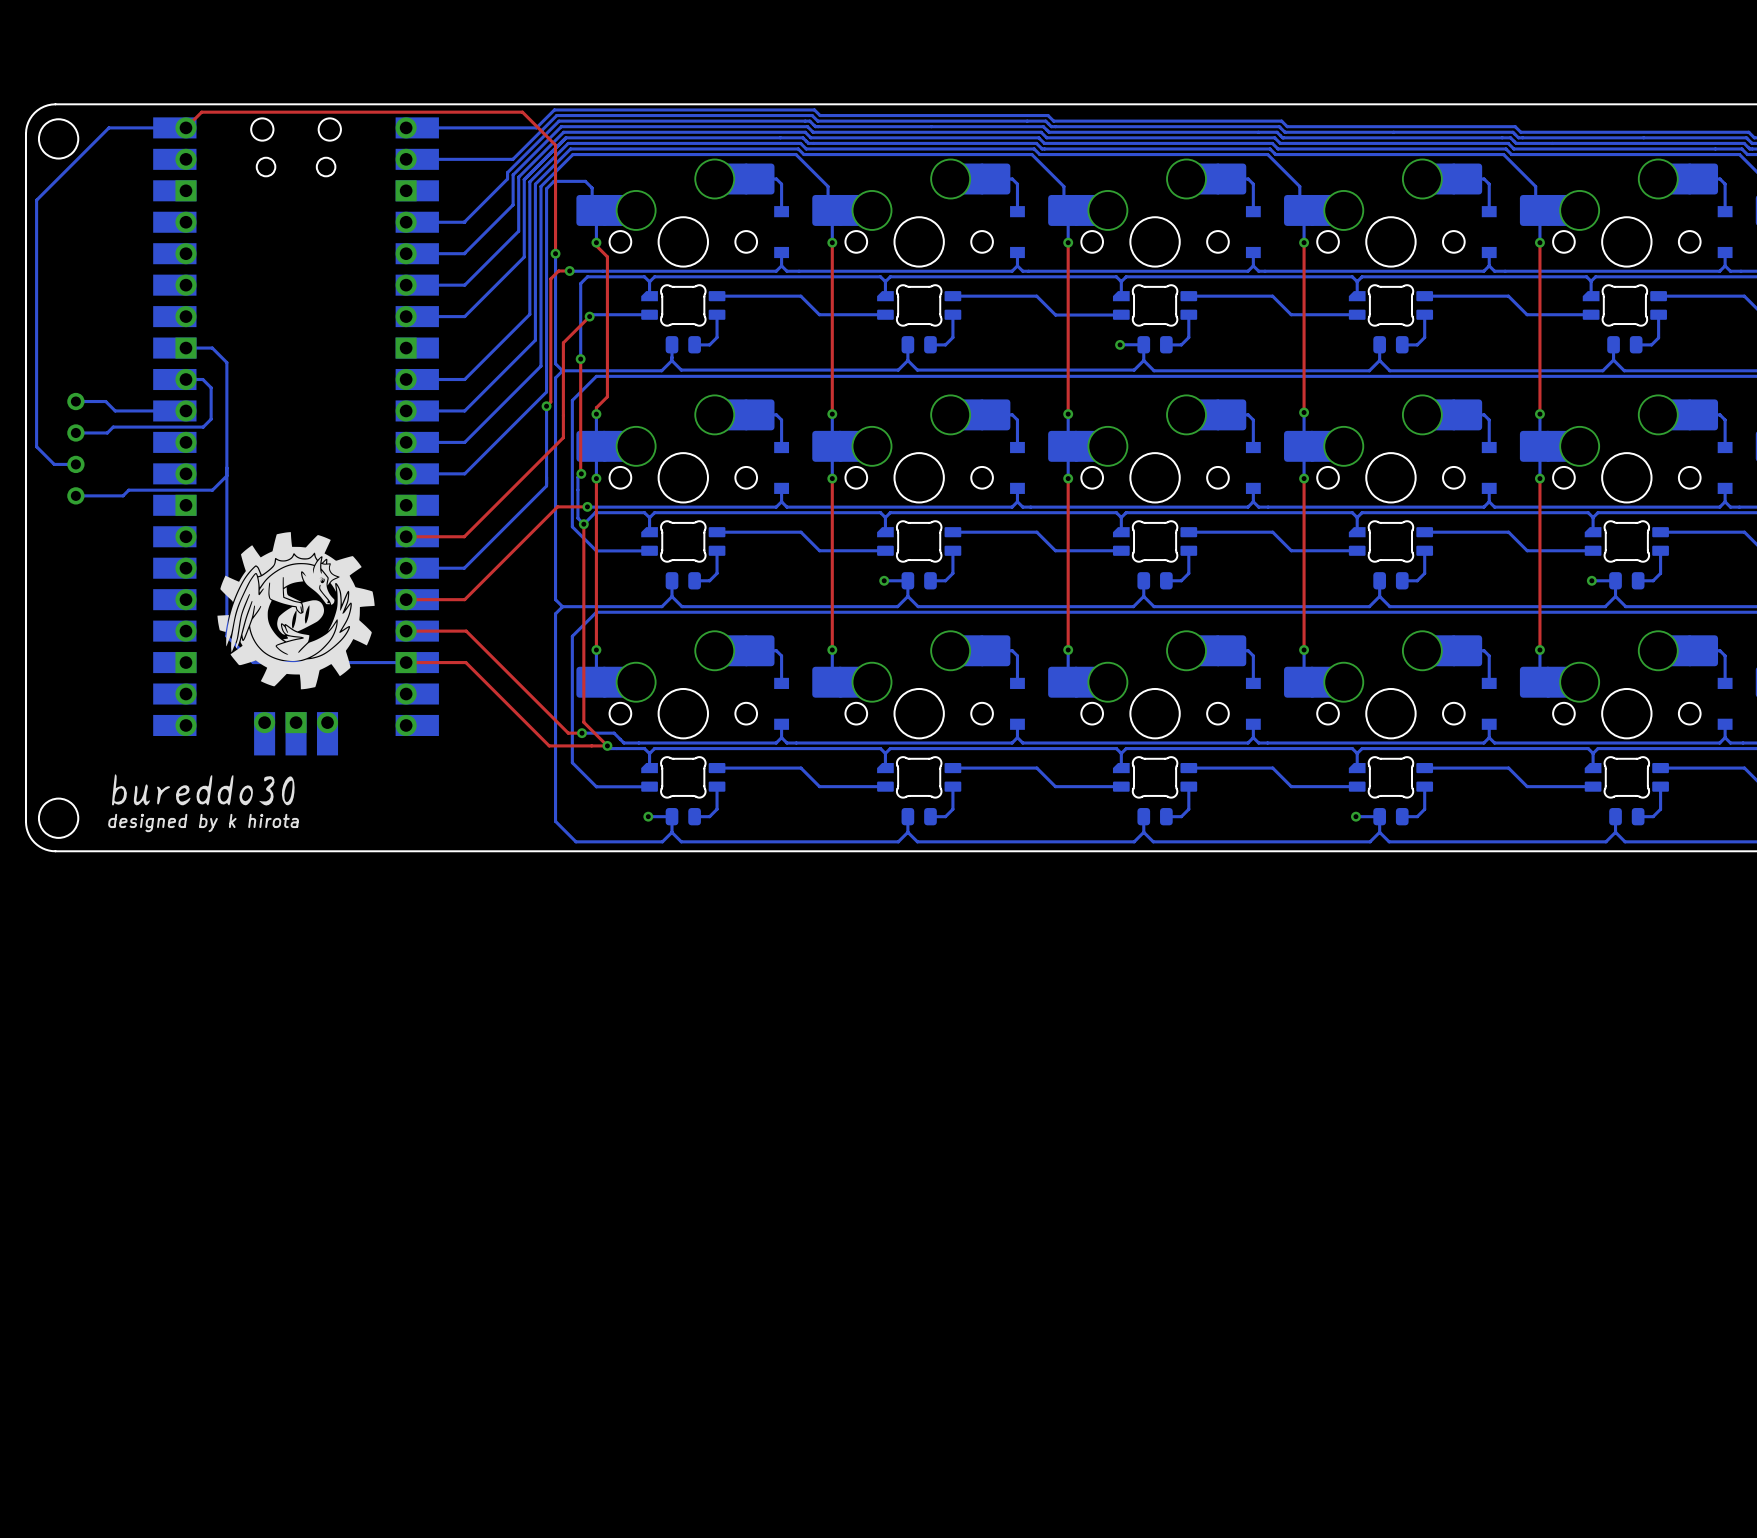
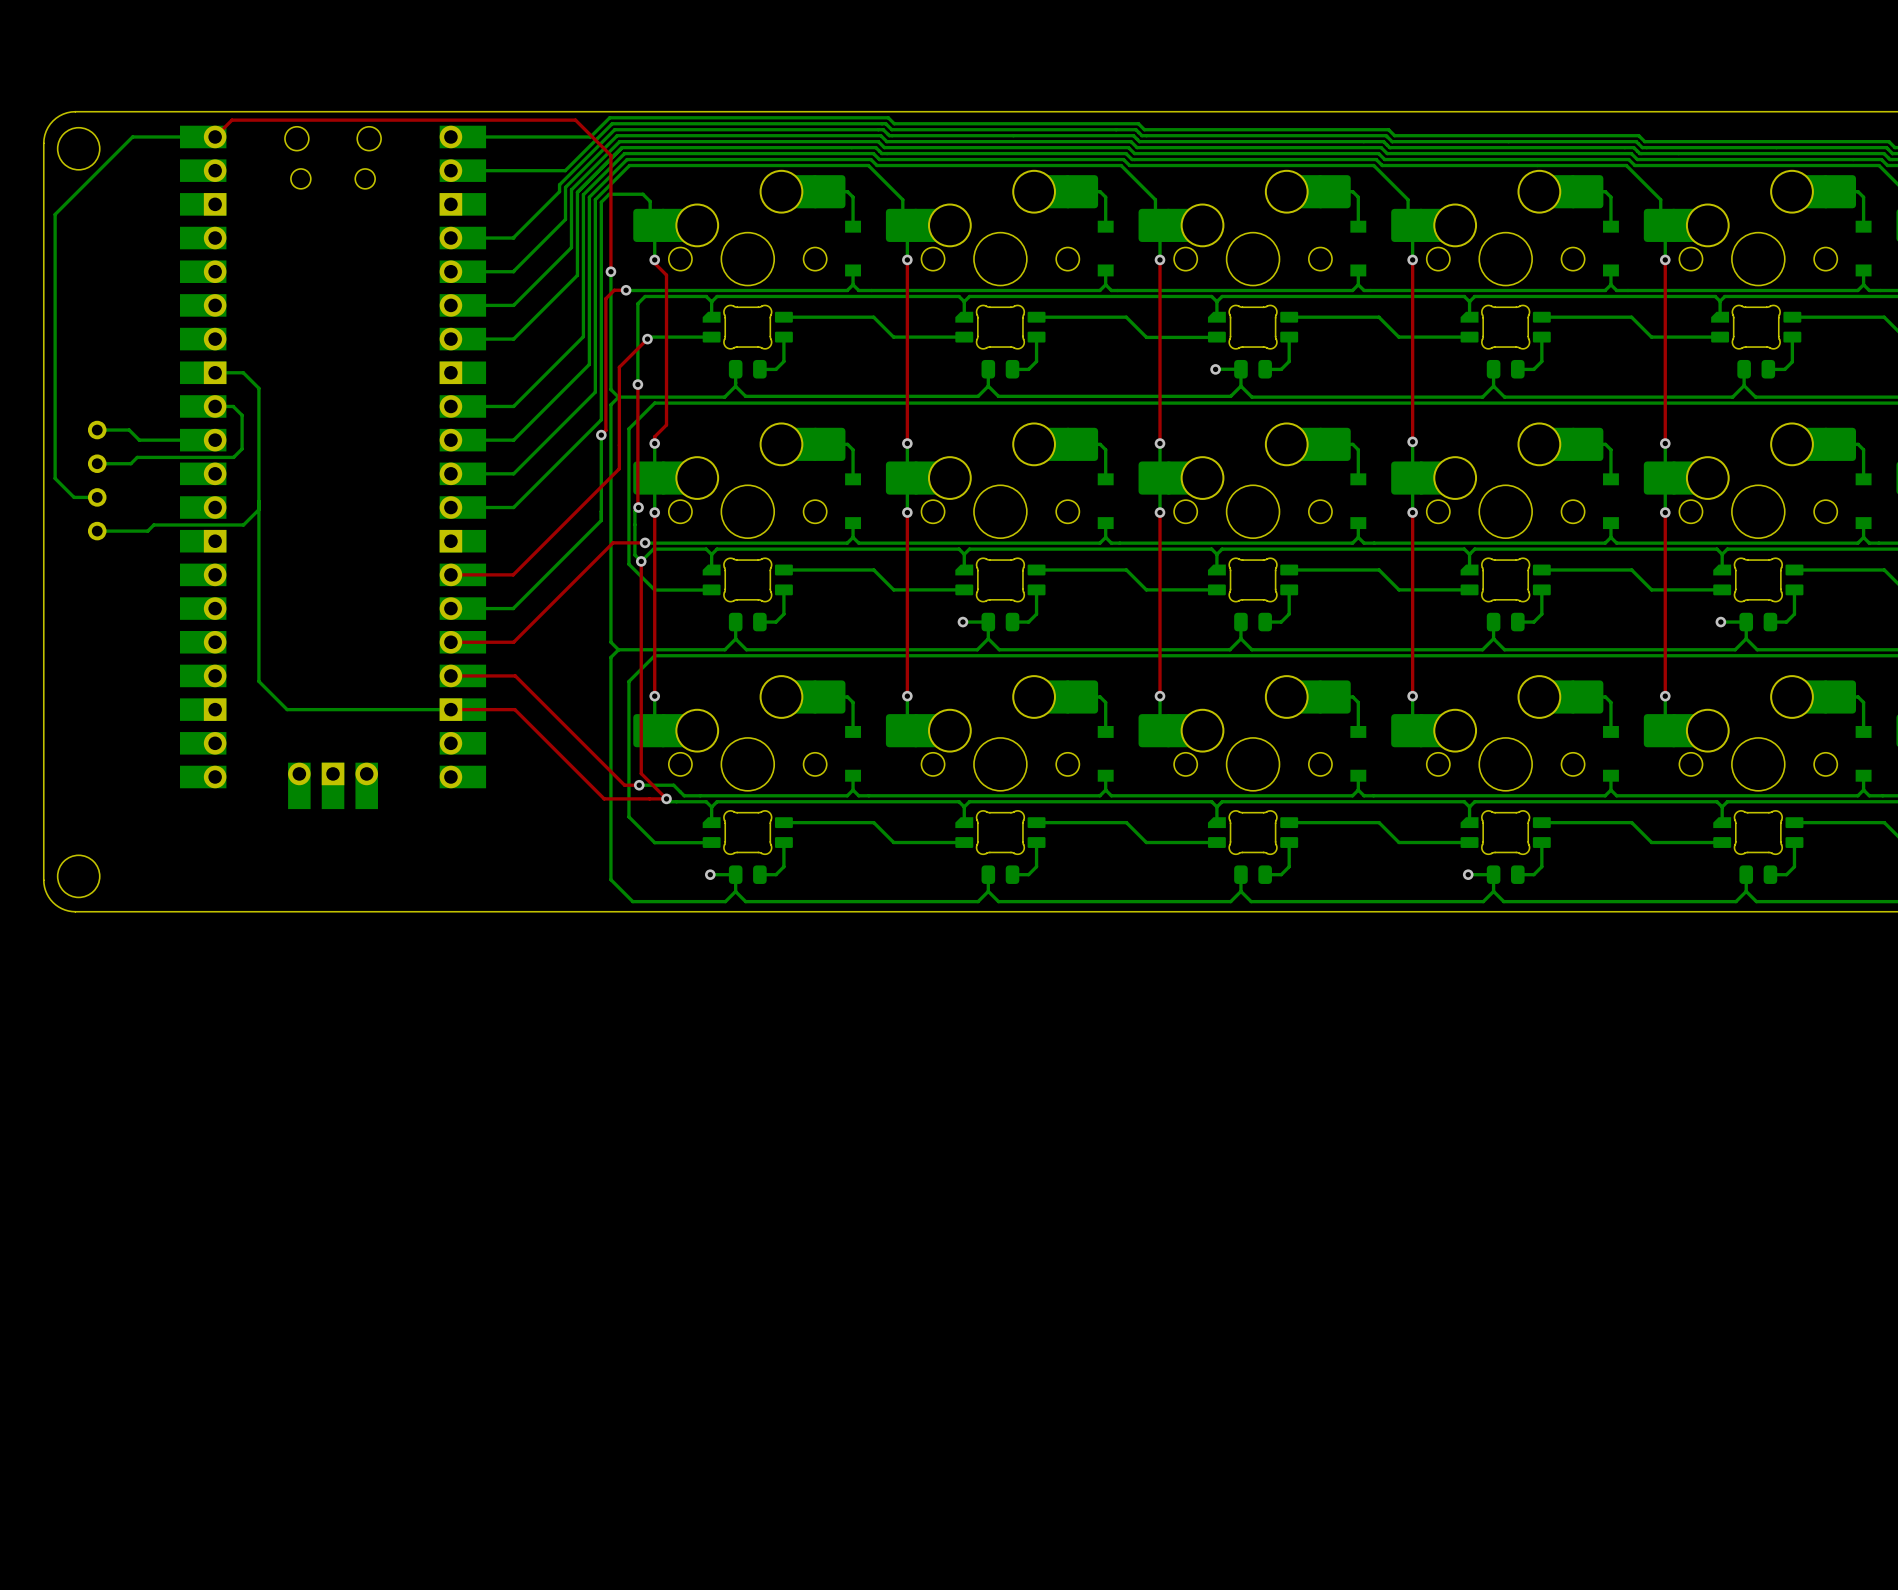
drawing: [217, 532, 375, 690] -> none
drawing: [112, 774, 295, 806] -> none
text: designed by k hirota (203, 822) -> none

